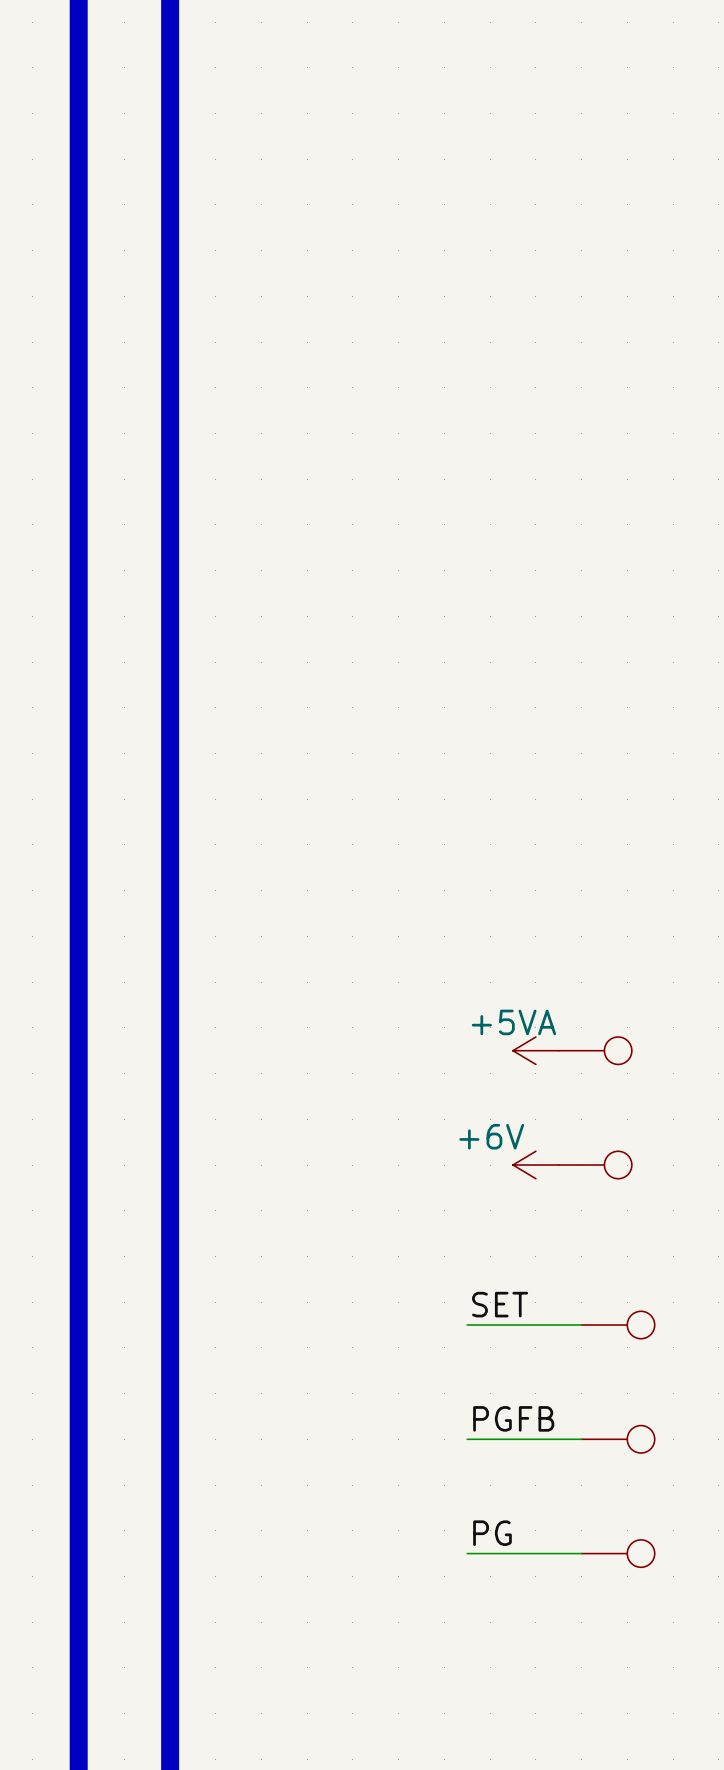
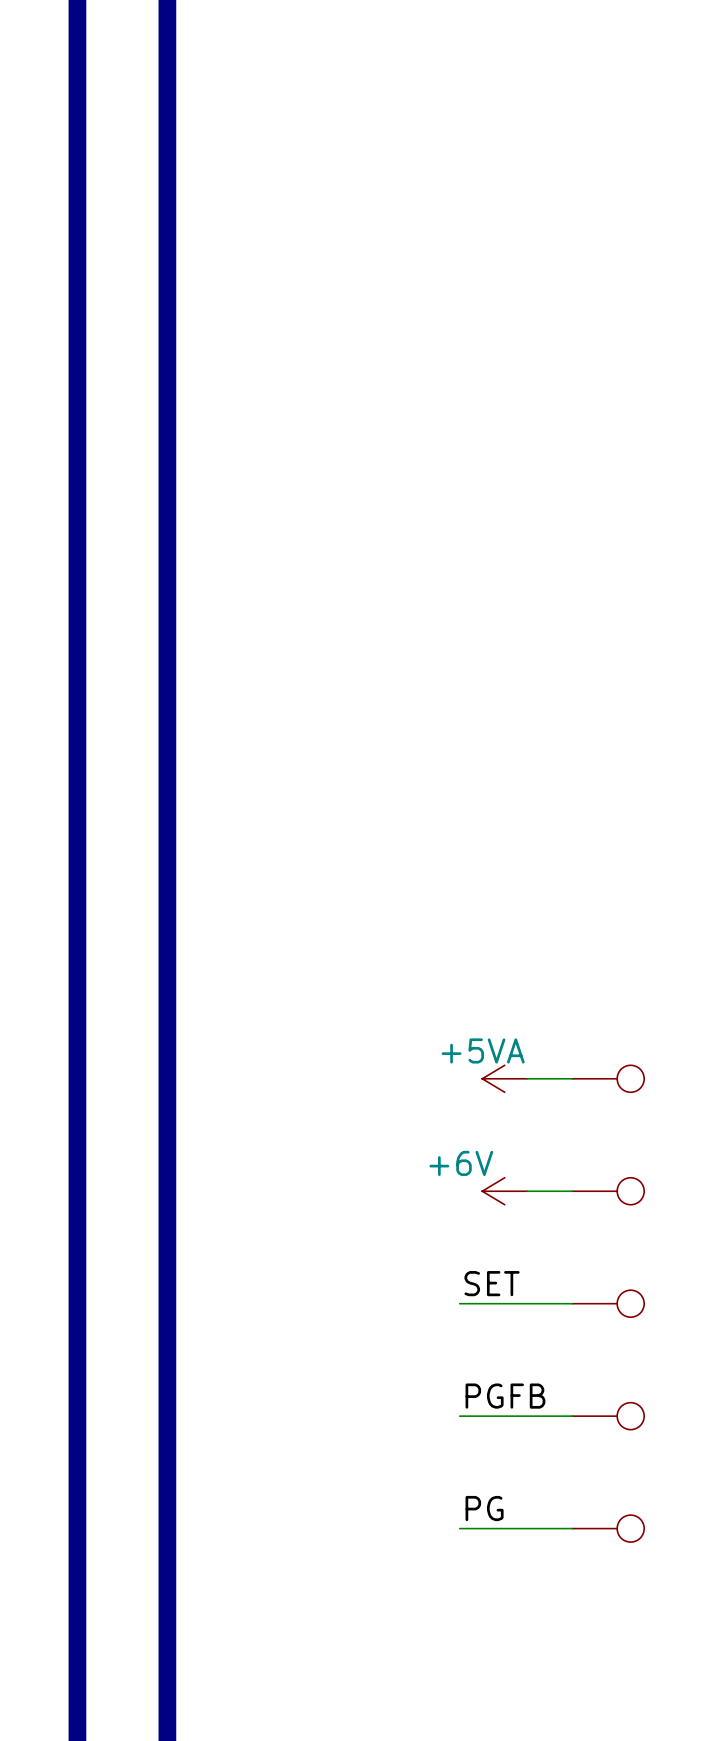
power symbol position: +5VA (535, 1050) -> +5VA (504, 1078)
part: (595, 1050) -> none
wire: none -> (527, 1078) (572, 1078)
part: none -> (608, 1078)
power symbol position: +6V (535, 1165) -> +6V (504, 1191)
part: (595, 1165) -> none
wire: none -> (527, 1191) (572, 1191)
part: none -> (608, 1191)

